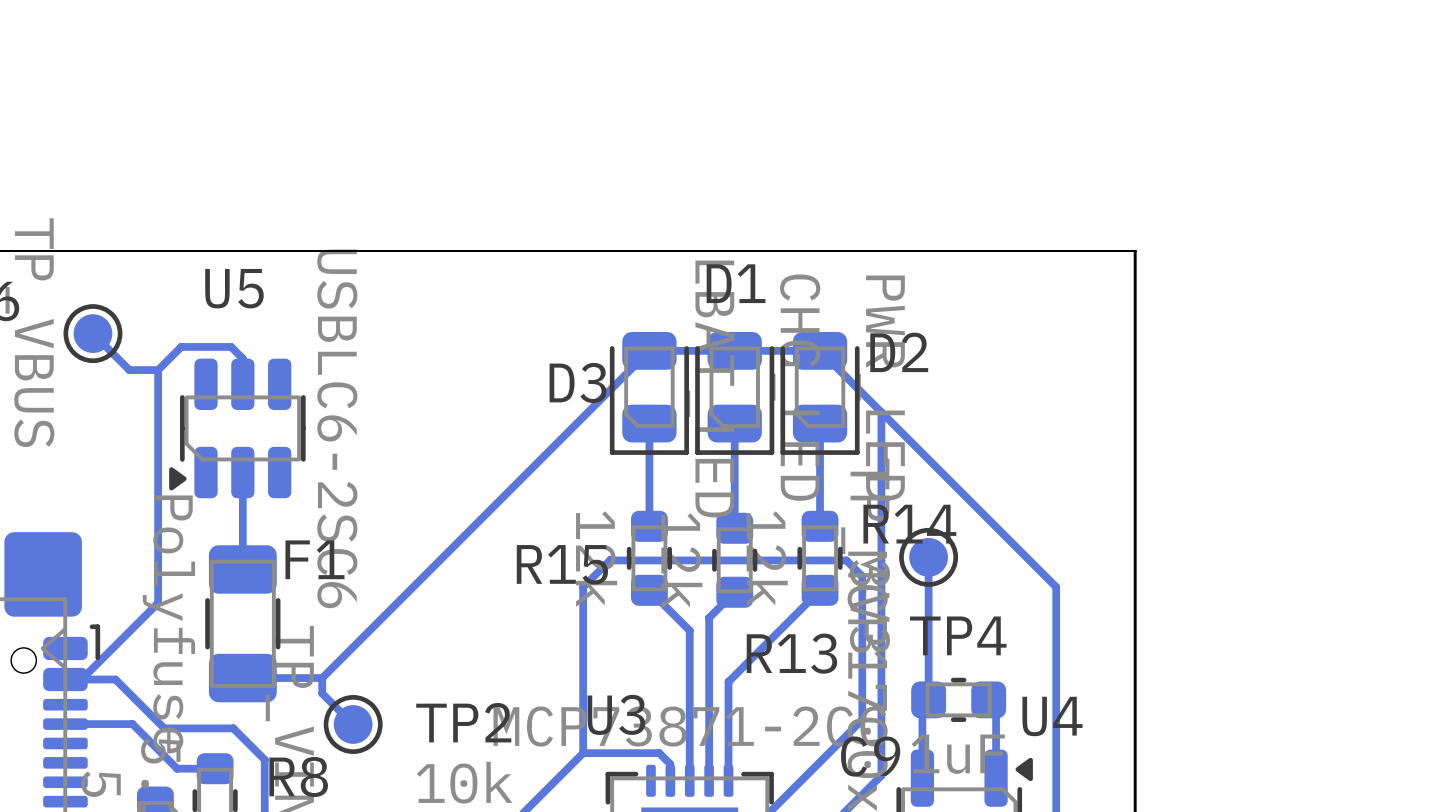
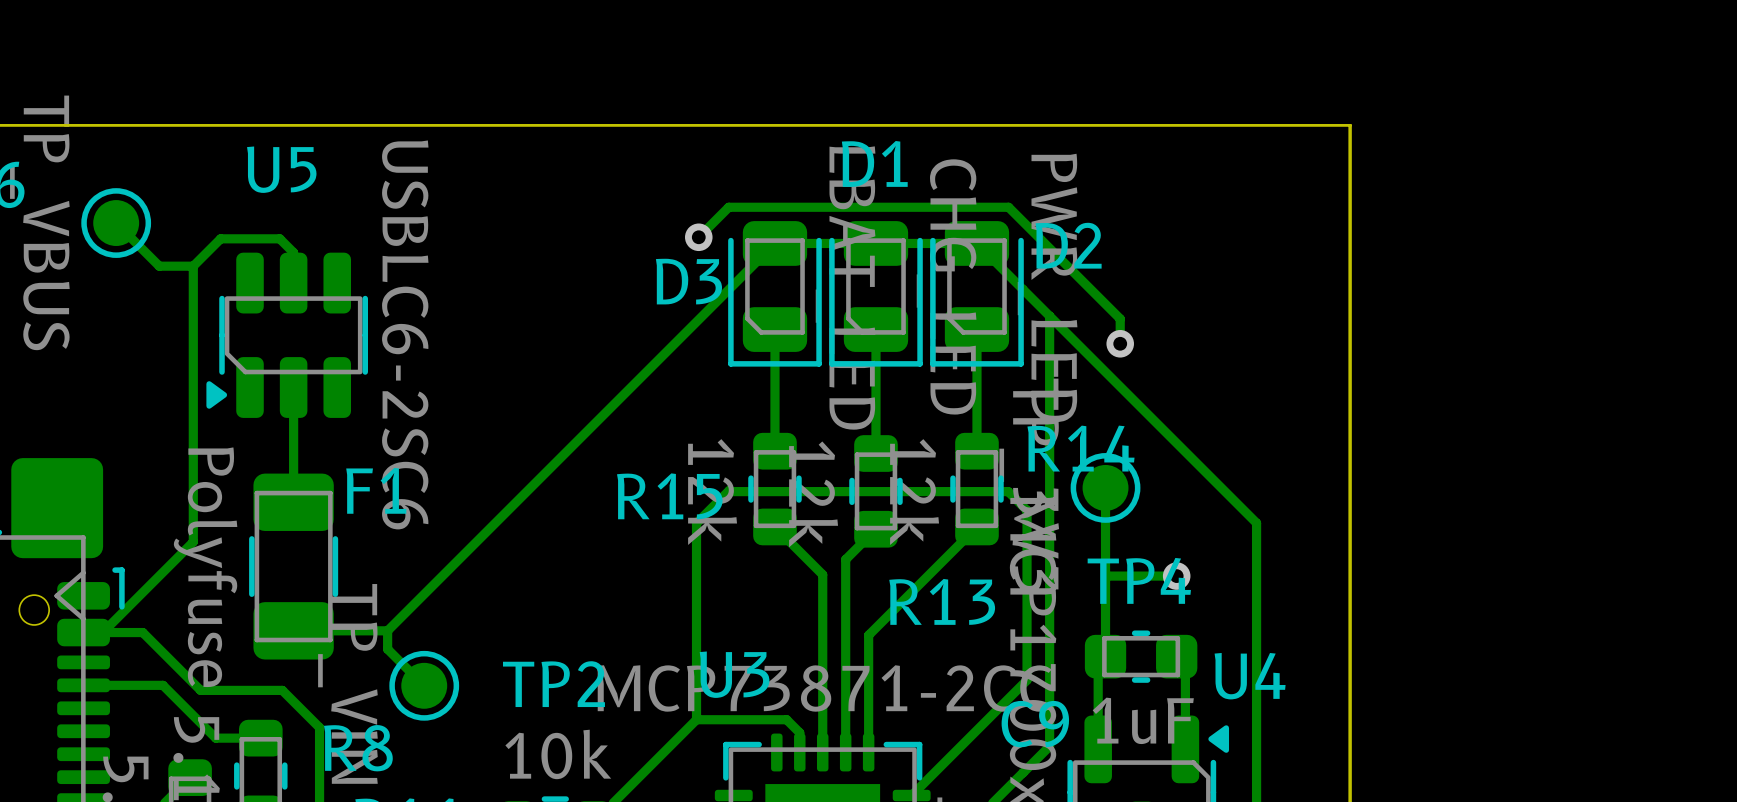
track: none -> (698, 237) (728, 207) (1008, 207) (1120, 318) (1120, 343)
via: none -> (698, 237)
via: none -> (1120, 343)
track: none -> (1176, 576) (1105, 576)
via: none -> (1176, 576)

